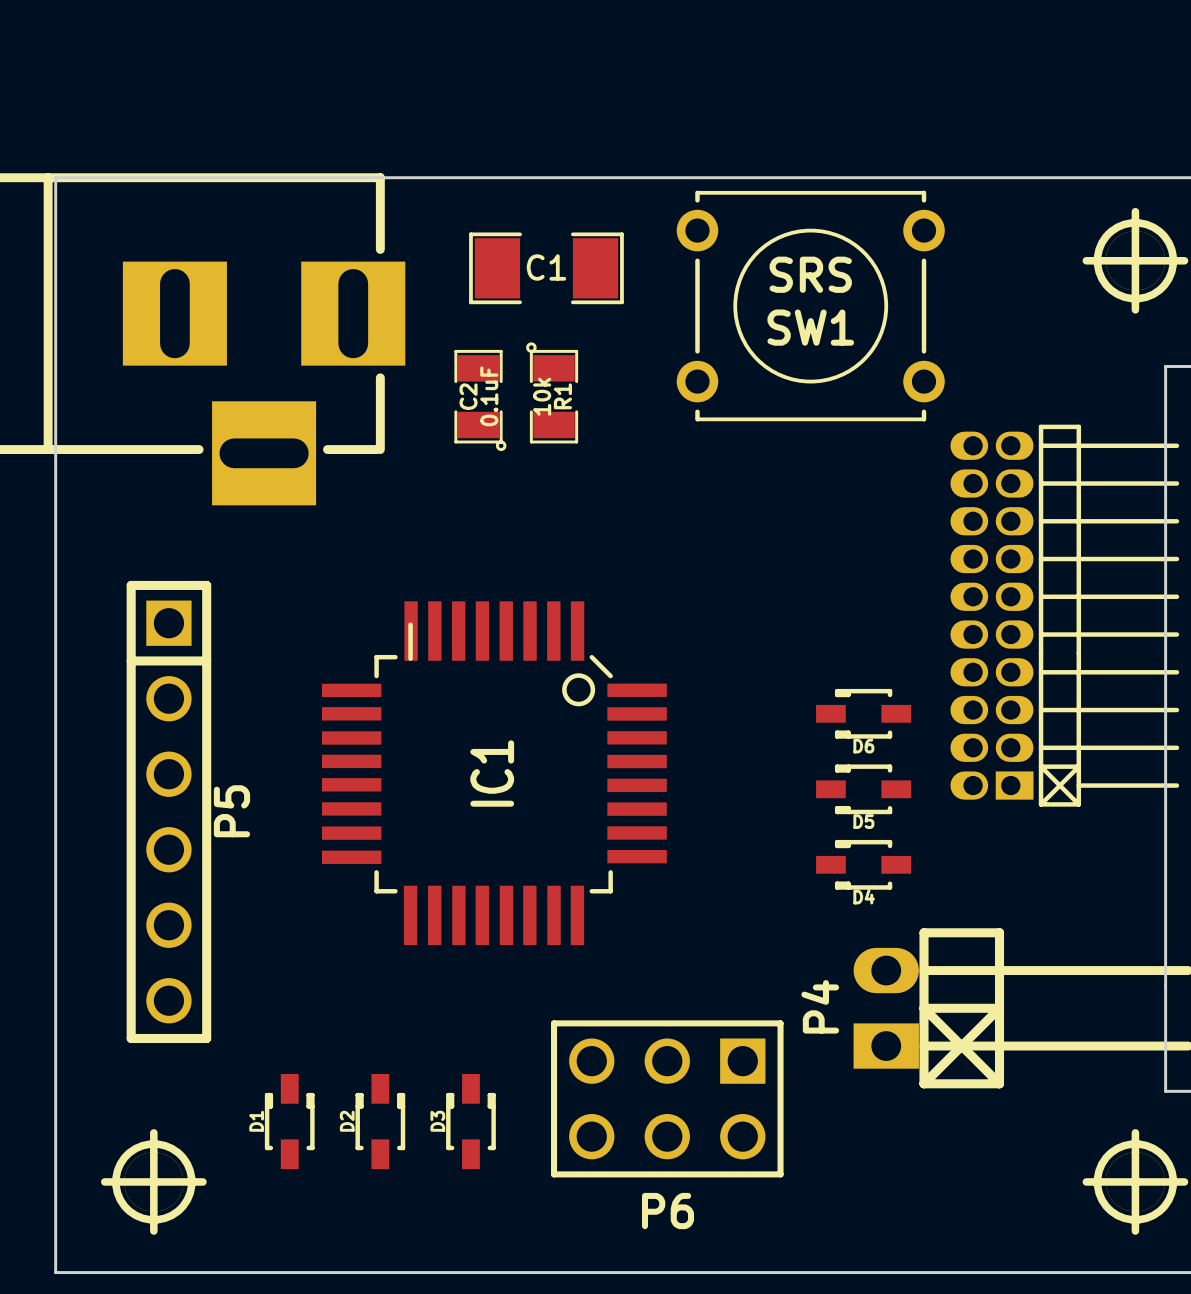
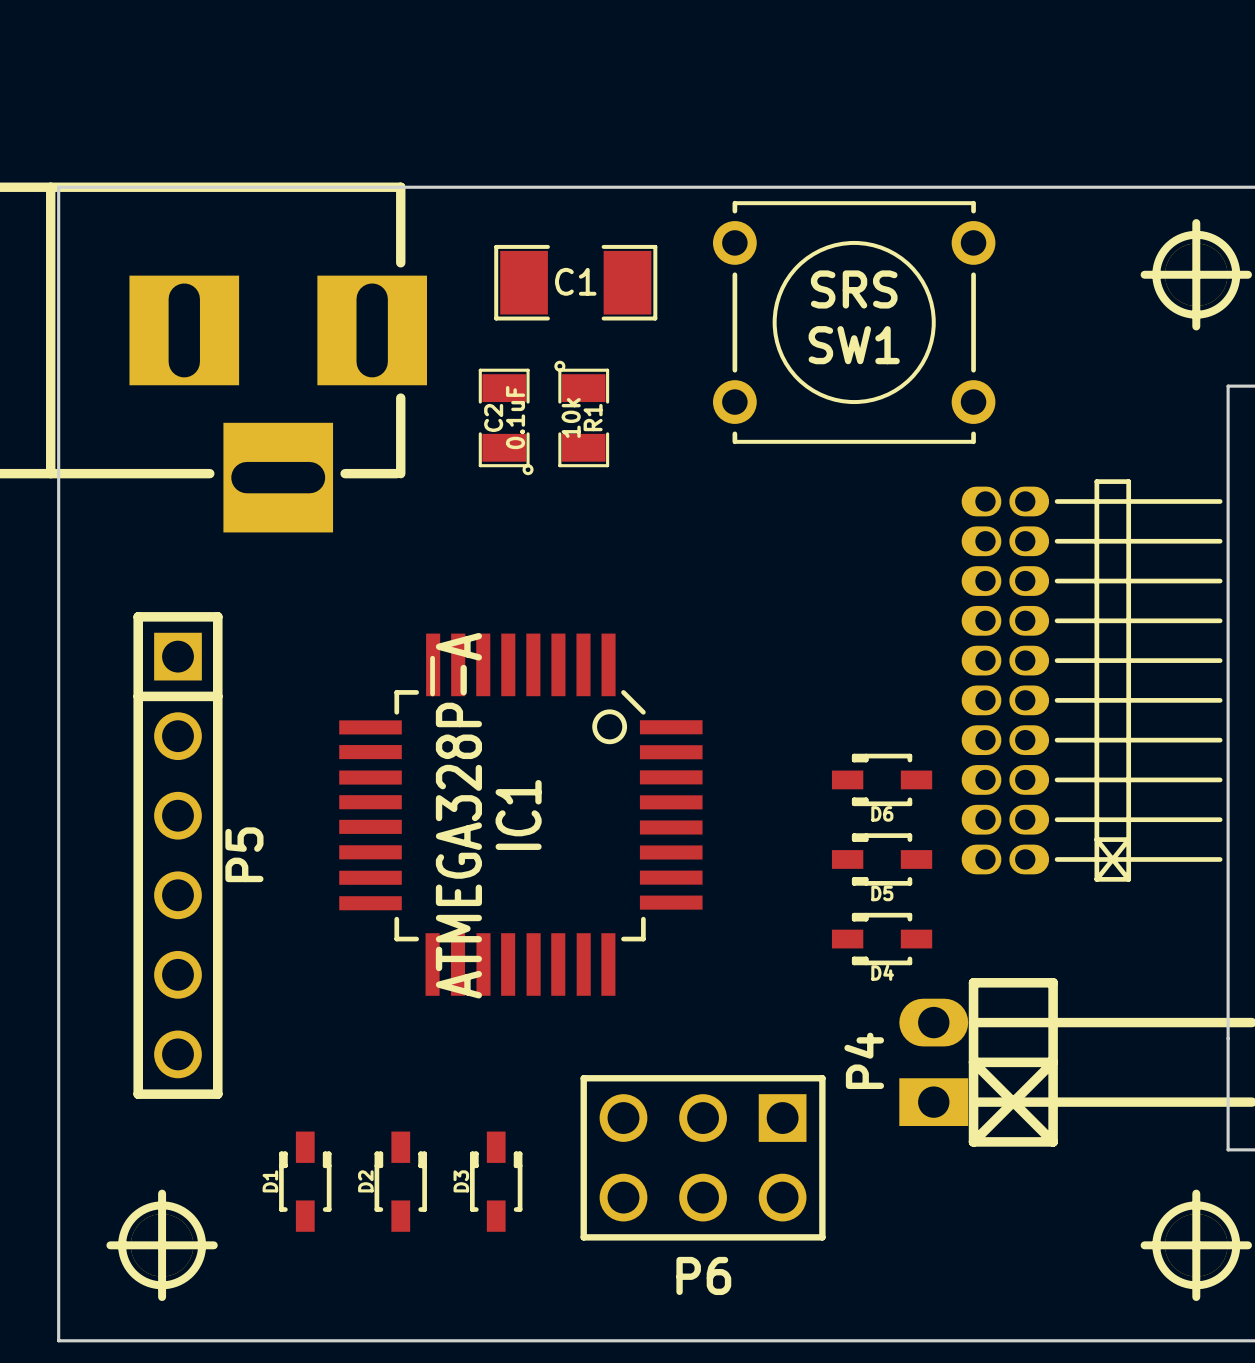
part: (1064, 615) -> none
part: none -> (1092, 680)
D6 position: (863, 713) -> (882, 779)
IC1 value: none -> ATMEGA328P-A (458, 815)
D5 position: (863, 789) -> (882, 859)
D4 position: (863, 864) -> (882, 939)

